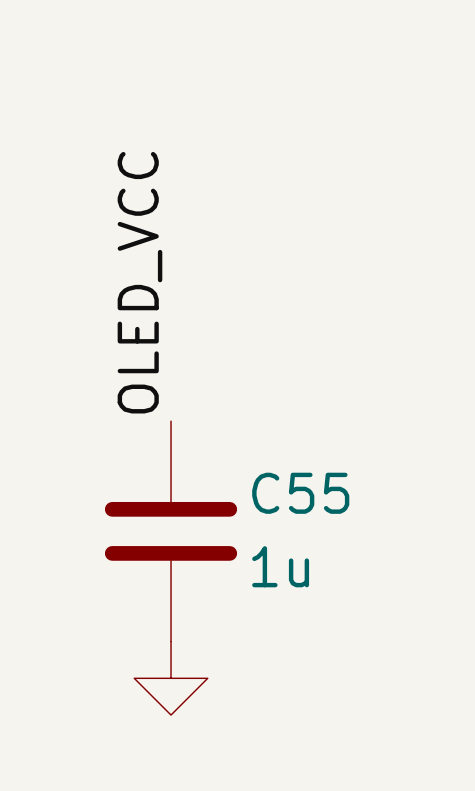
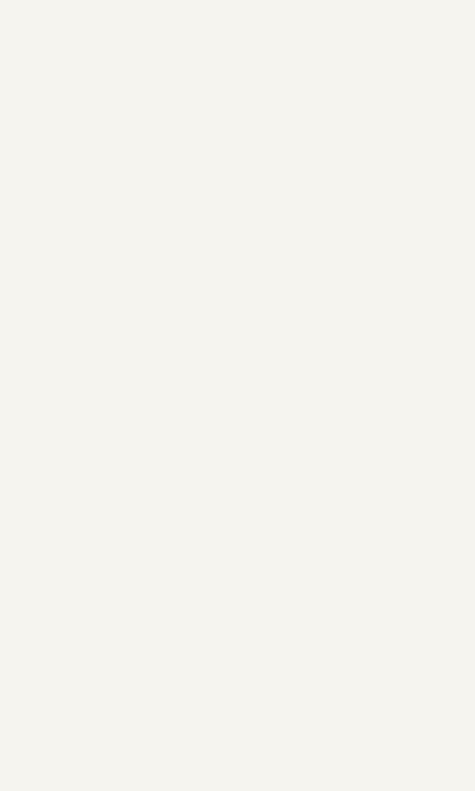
label: OLED_VCC (139, 282) -> none
C55: 1u (171, 531) -> none
power symbol: (171, 678) -> none

